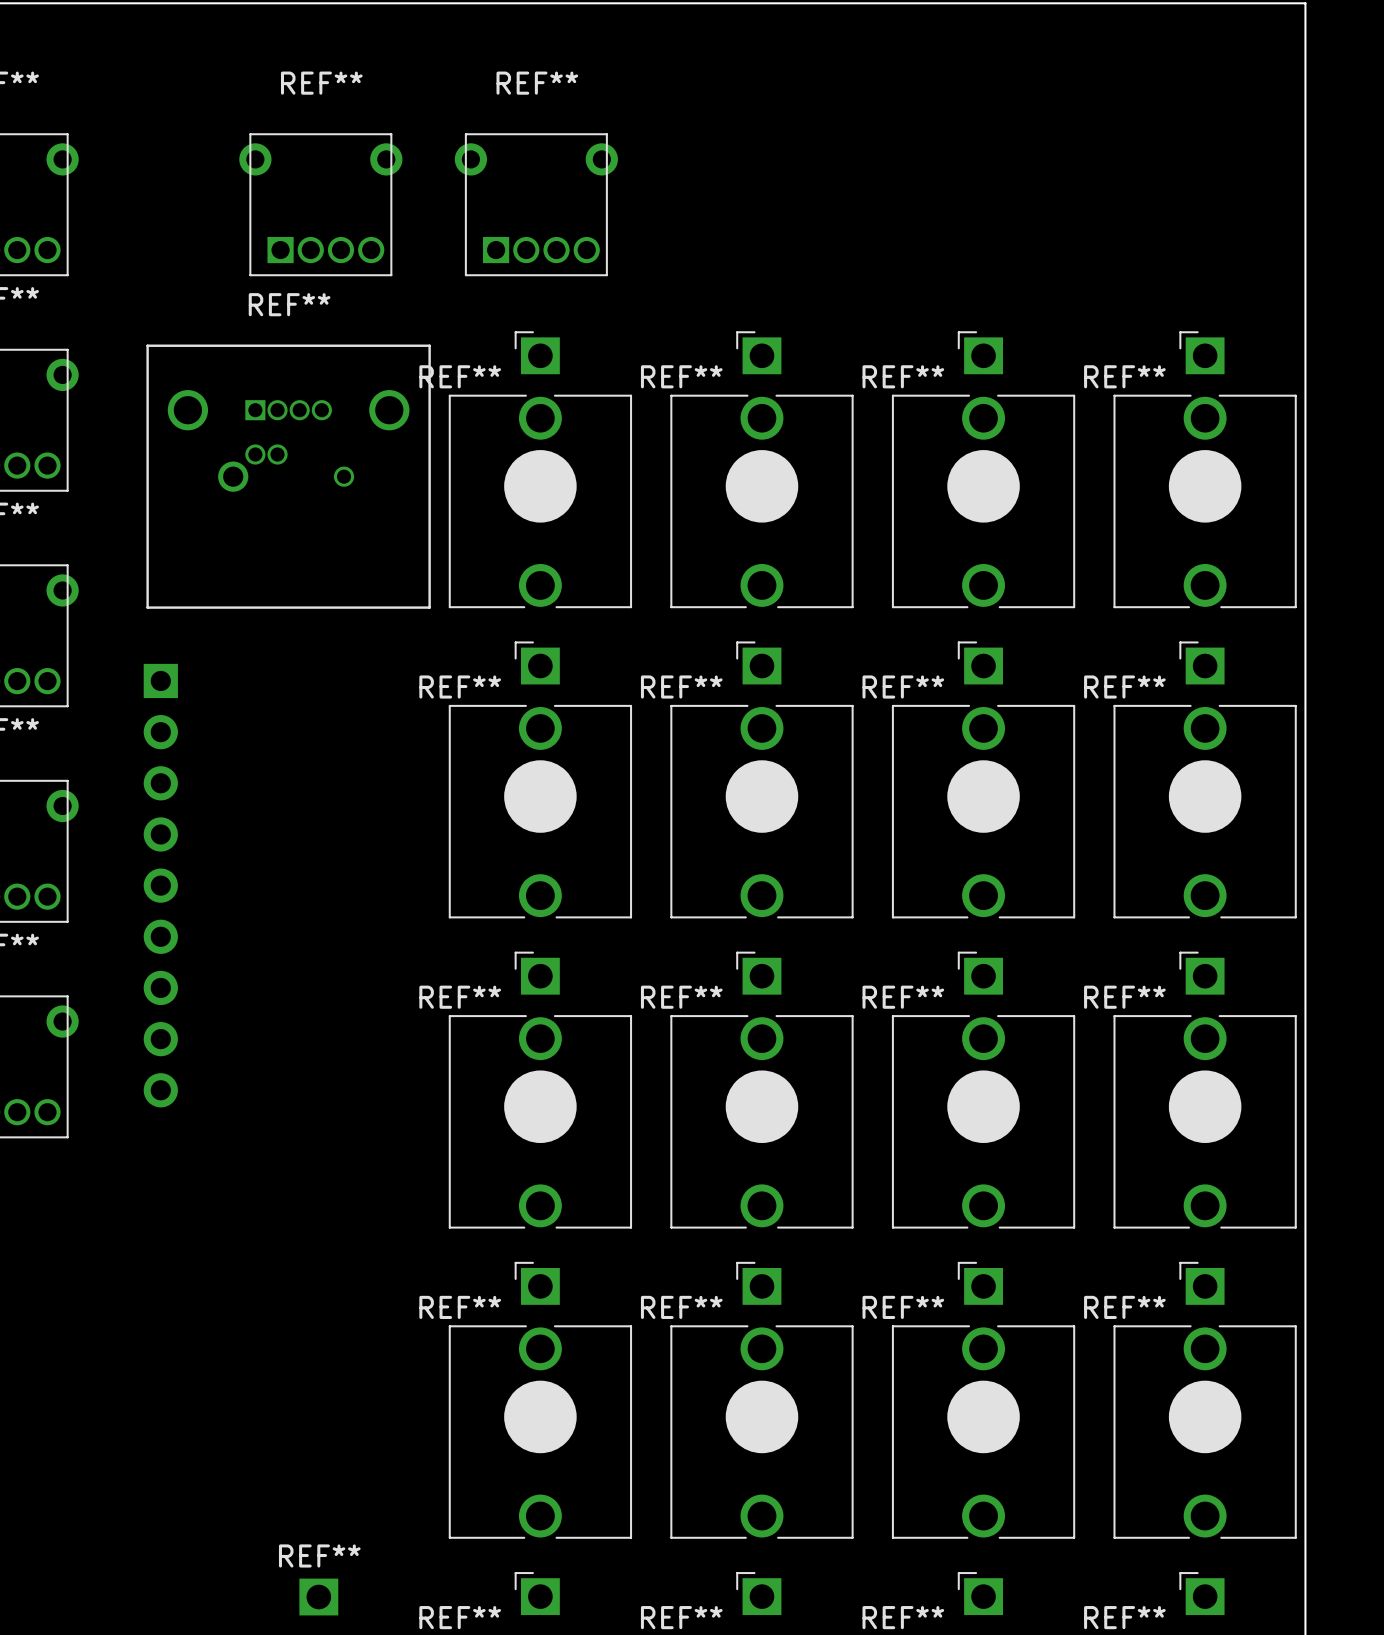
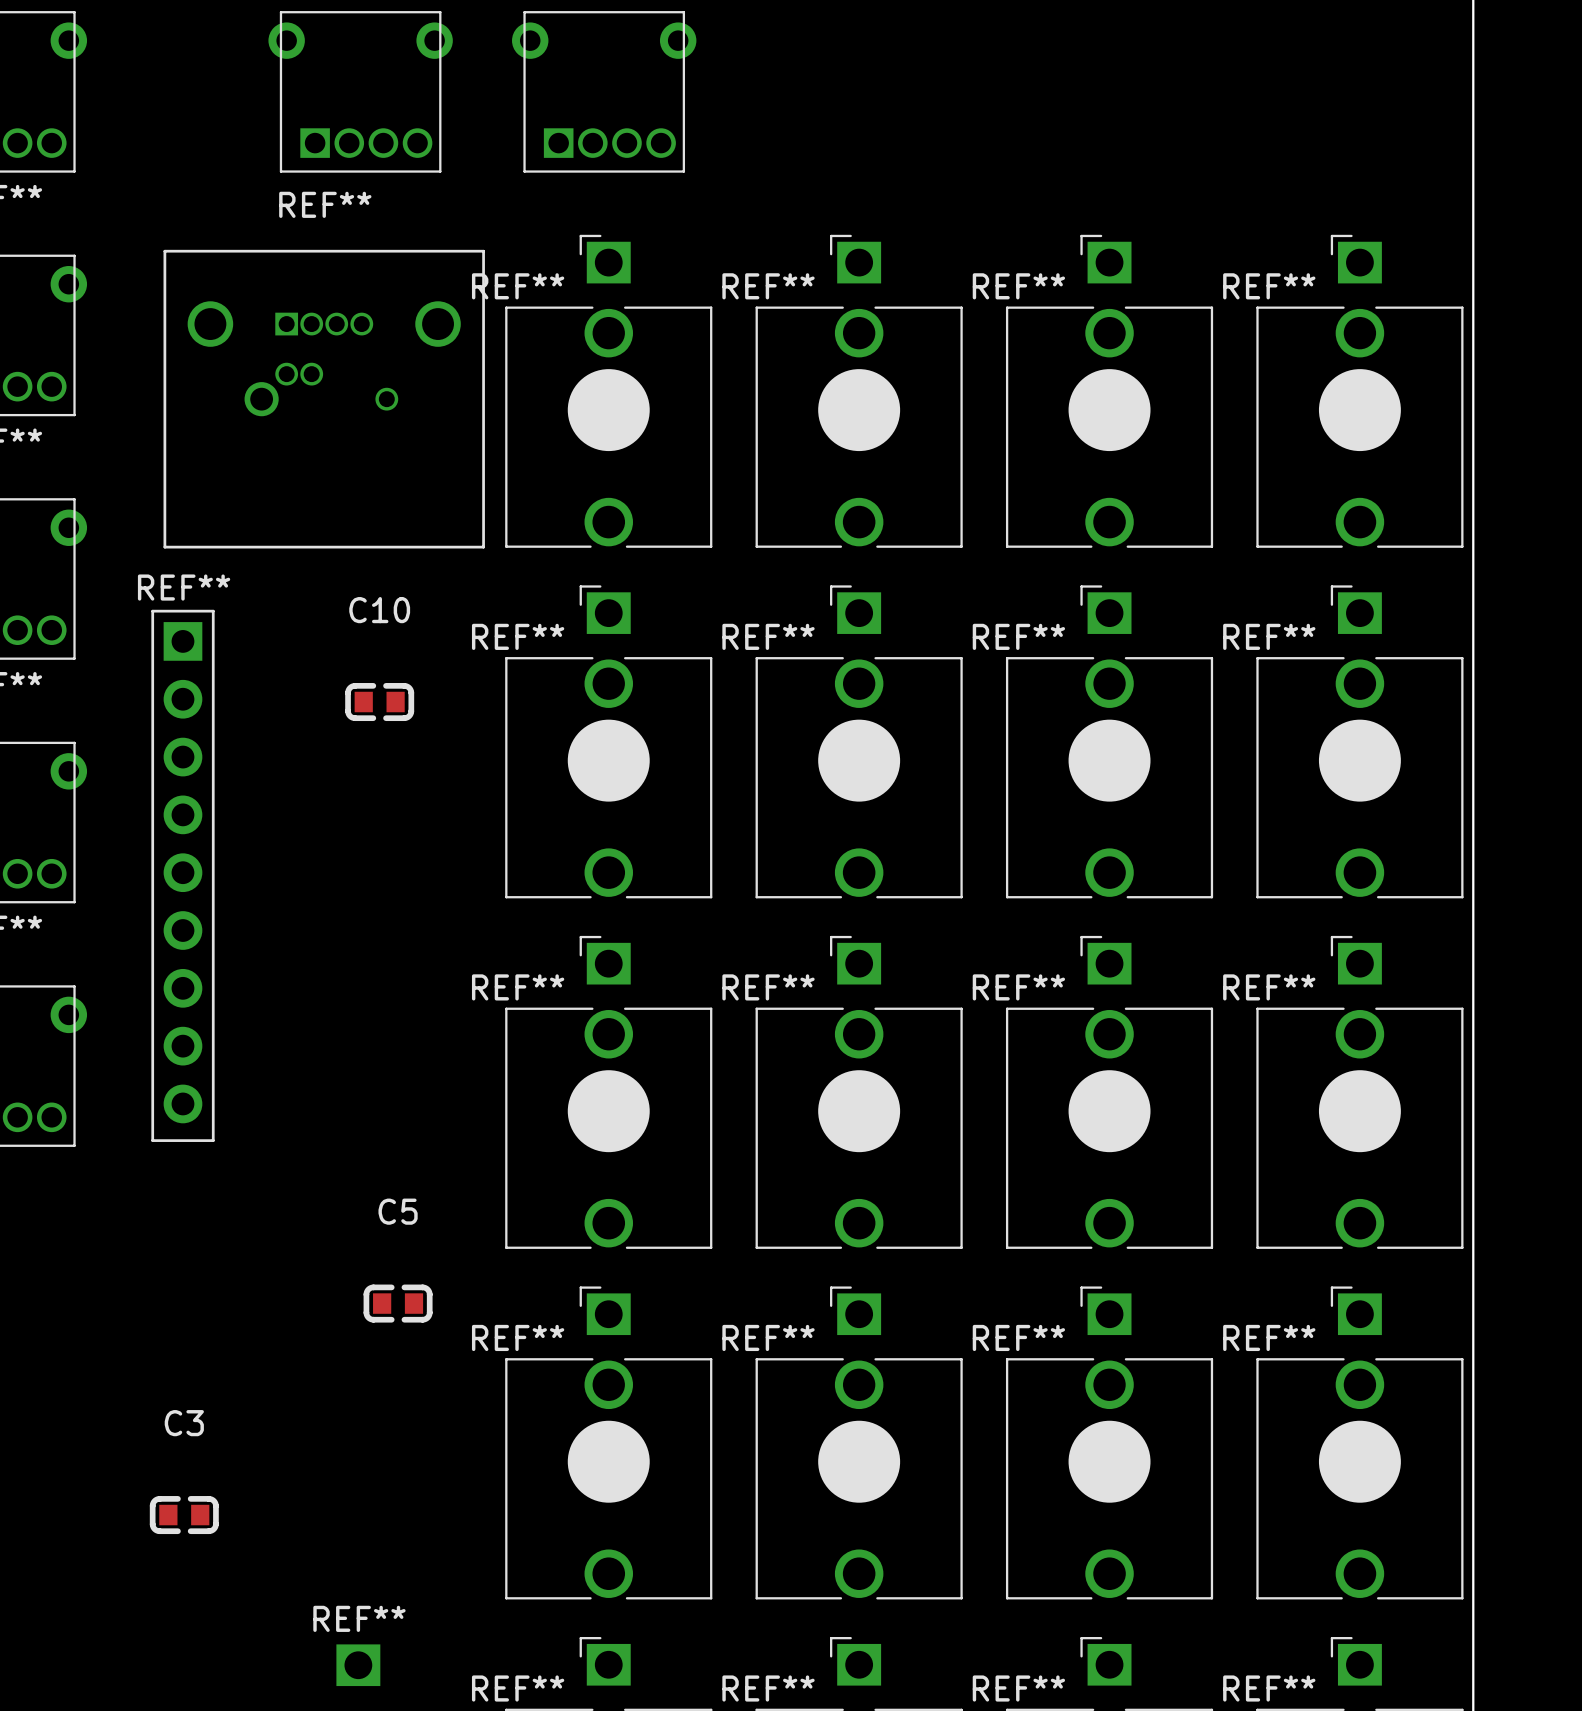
C10: none -> (379, 702)
REF** side: bottom (160, 885) -> top (182, 875)
C5: none -> (398, 1303)
C3: none -> (184, 1515)

